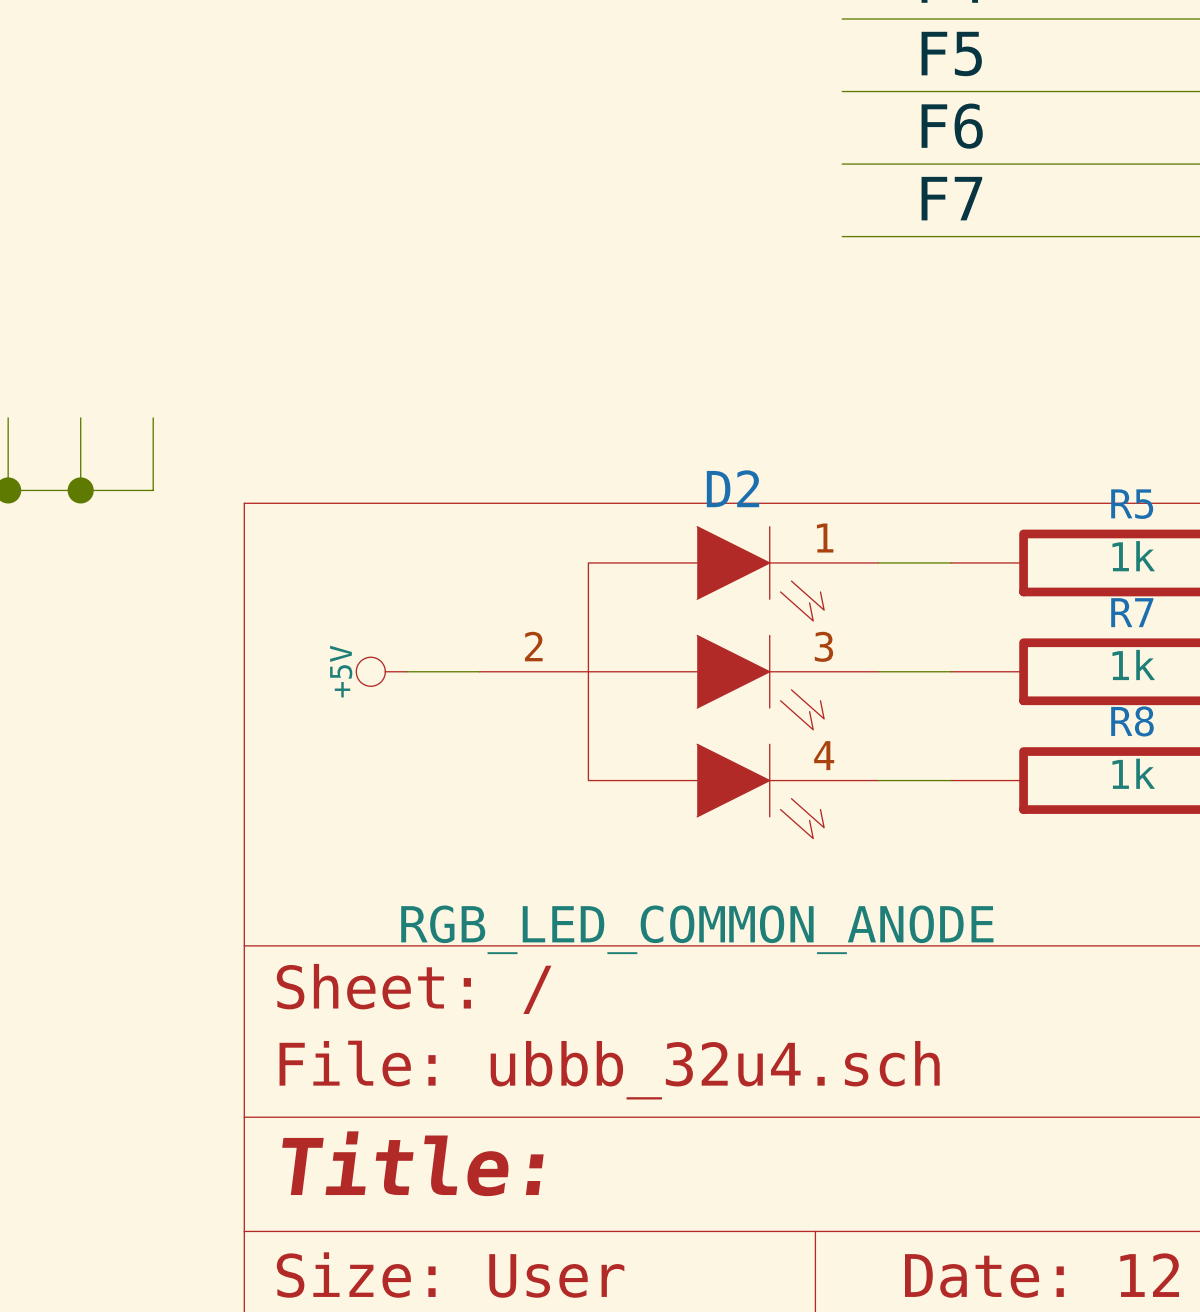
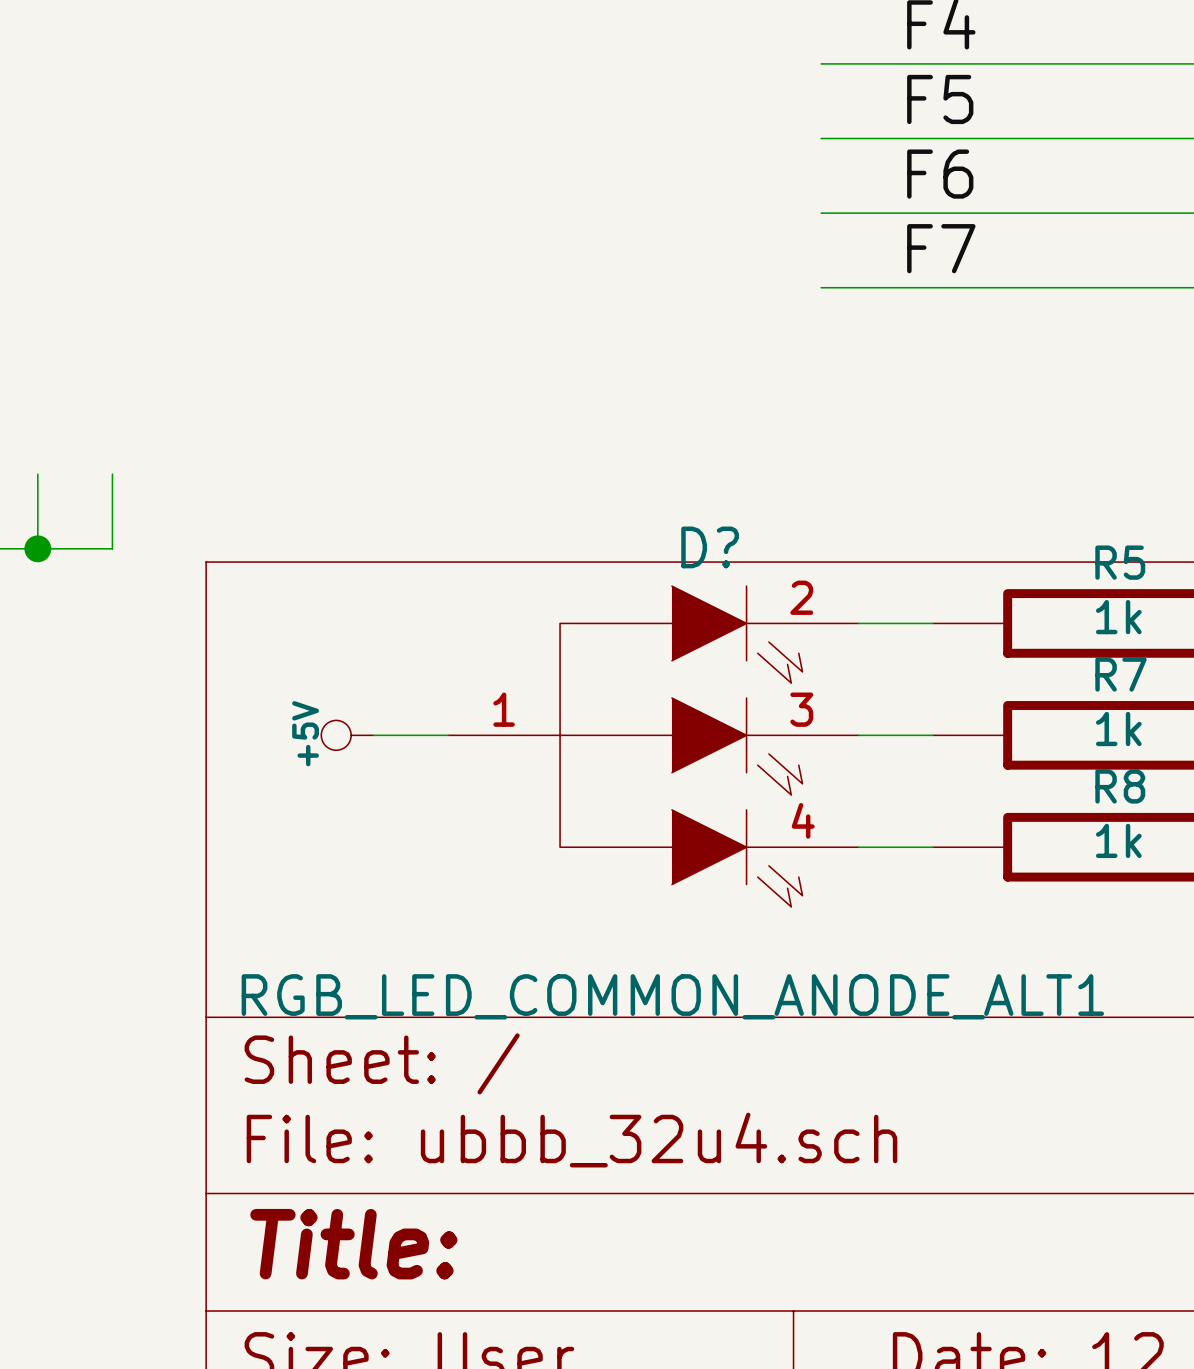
D2 name: D2 (733, 488) -> D? (710, 547)
D2 pin number: 1 (825, 538) -> 2 (801, 597)
D2 pin number: 2 (533, 646) -> 1 (504, 709)
D2 value: RGB_LED_COMMON_ANODE (697, 929) -> RGB_LED_COMMON_ANODE_ALT1 (672, 996)

